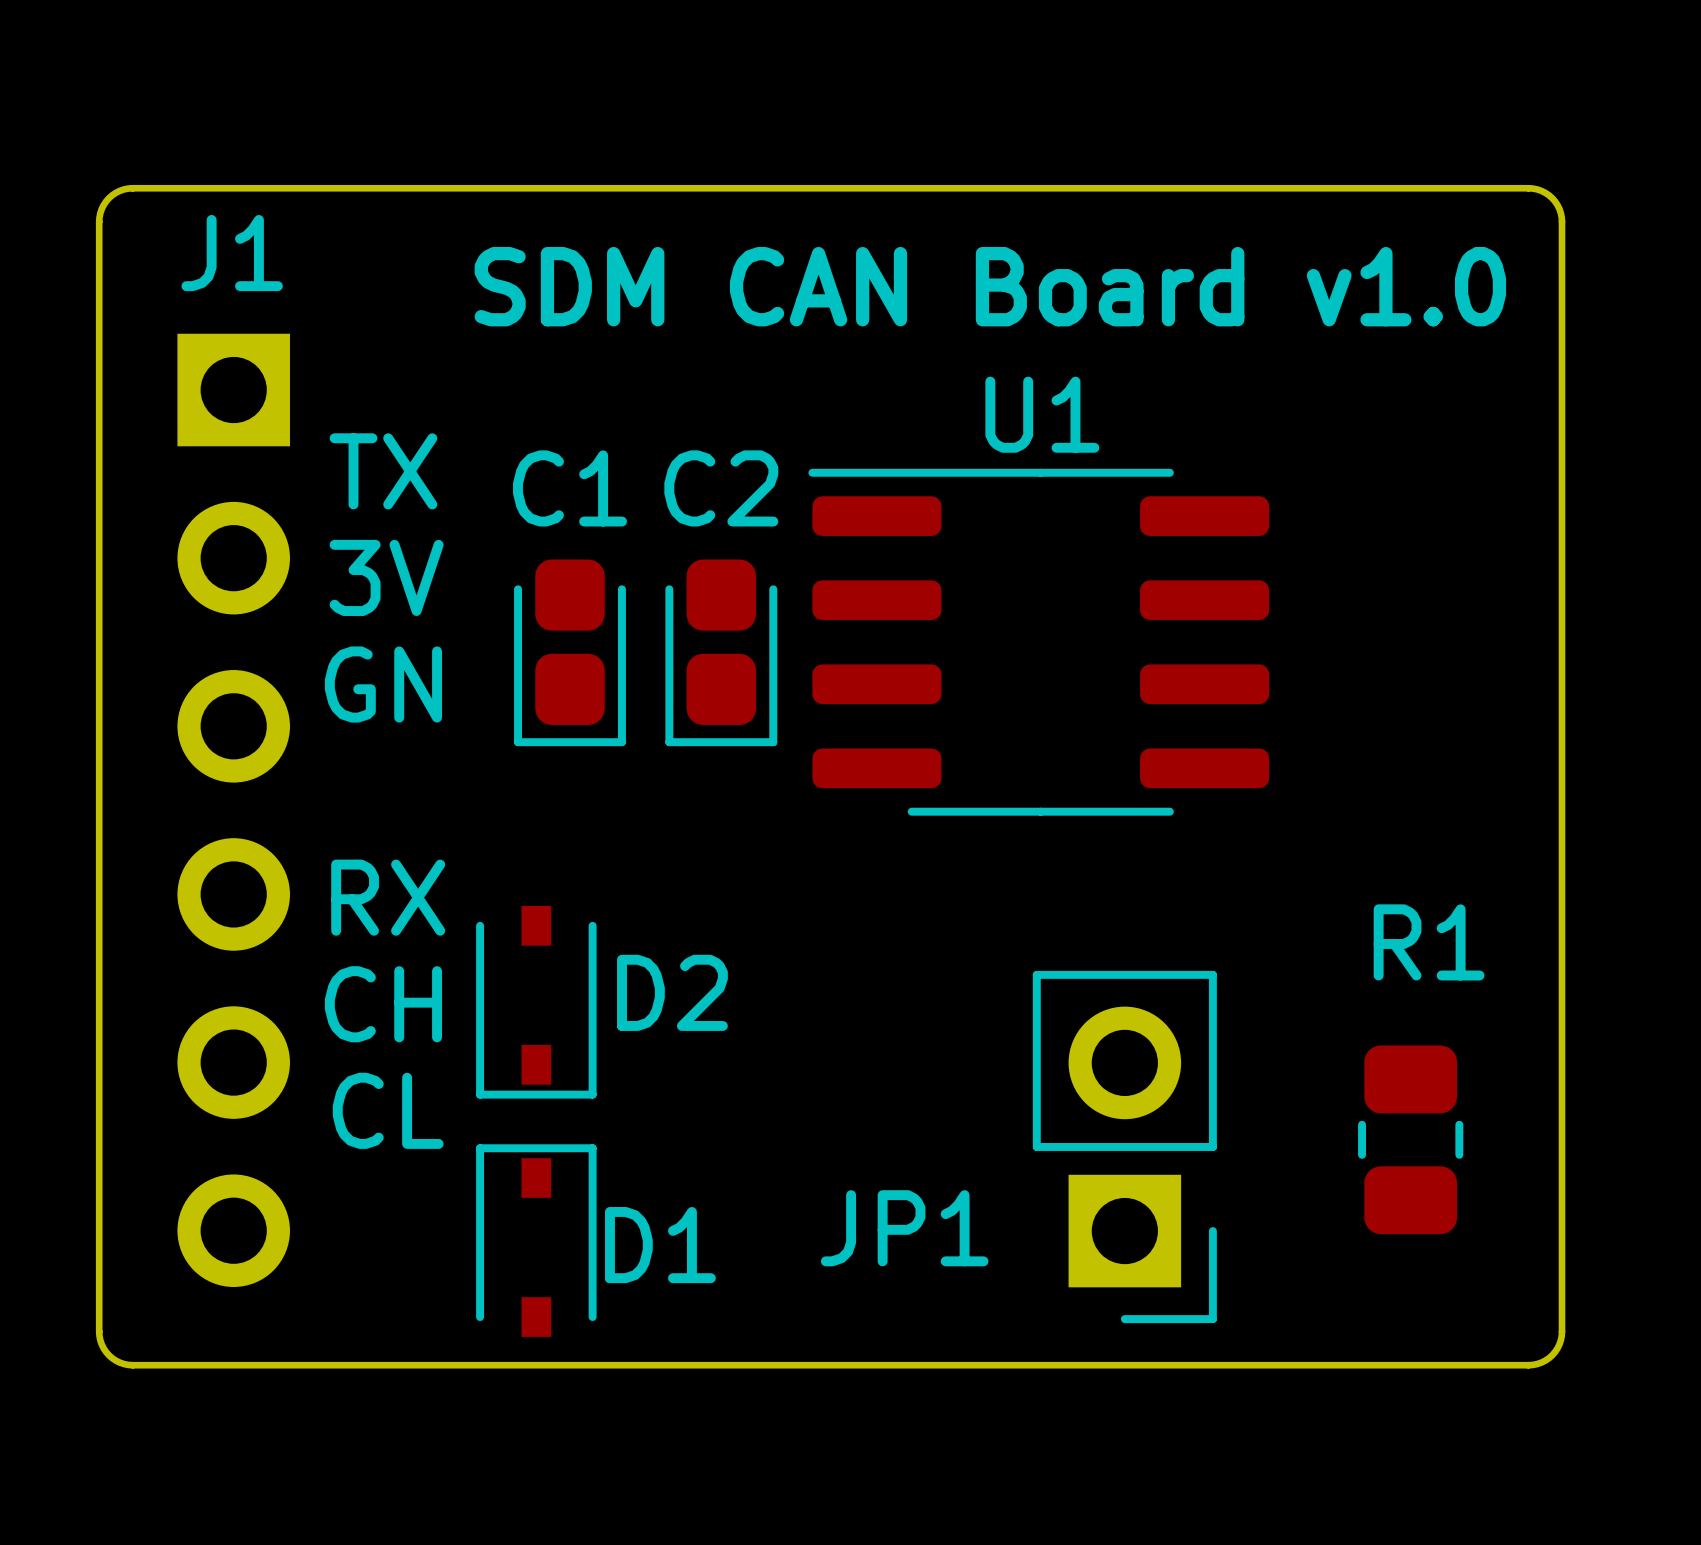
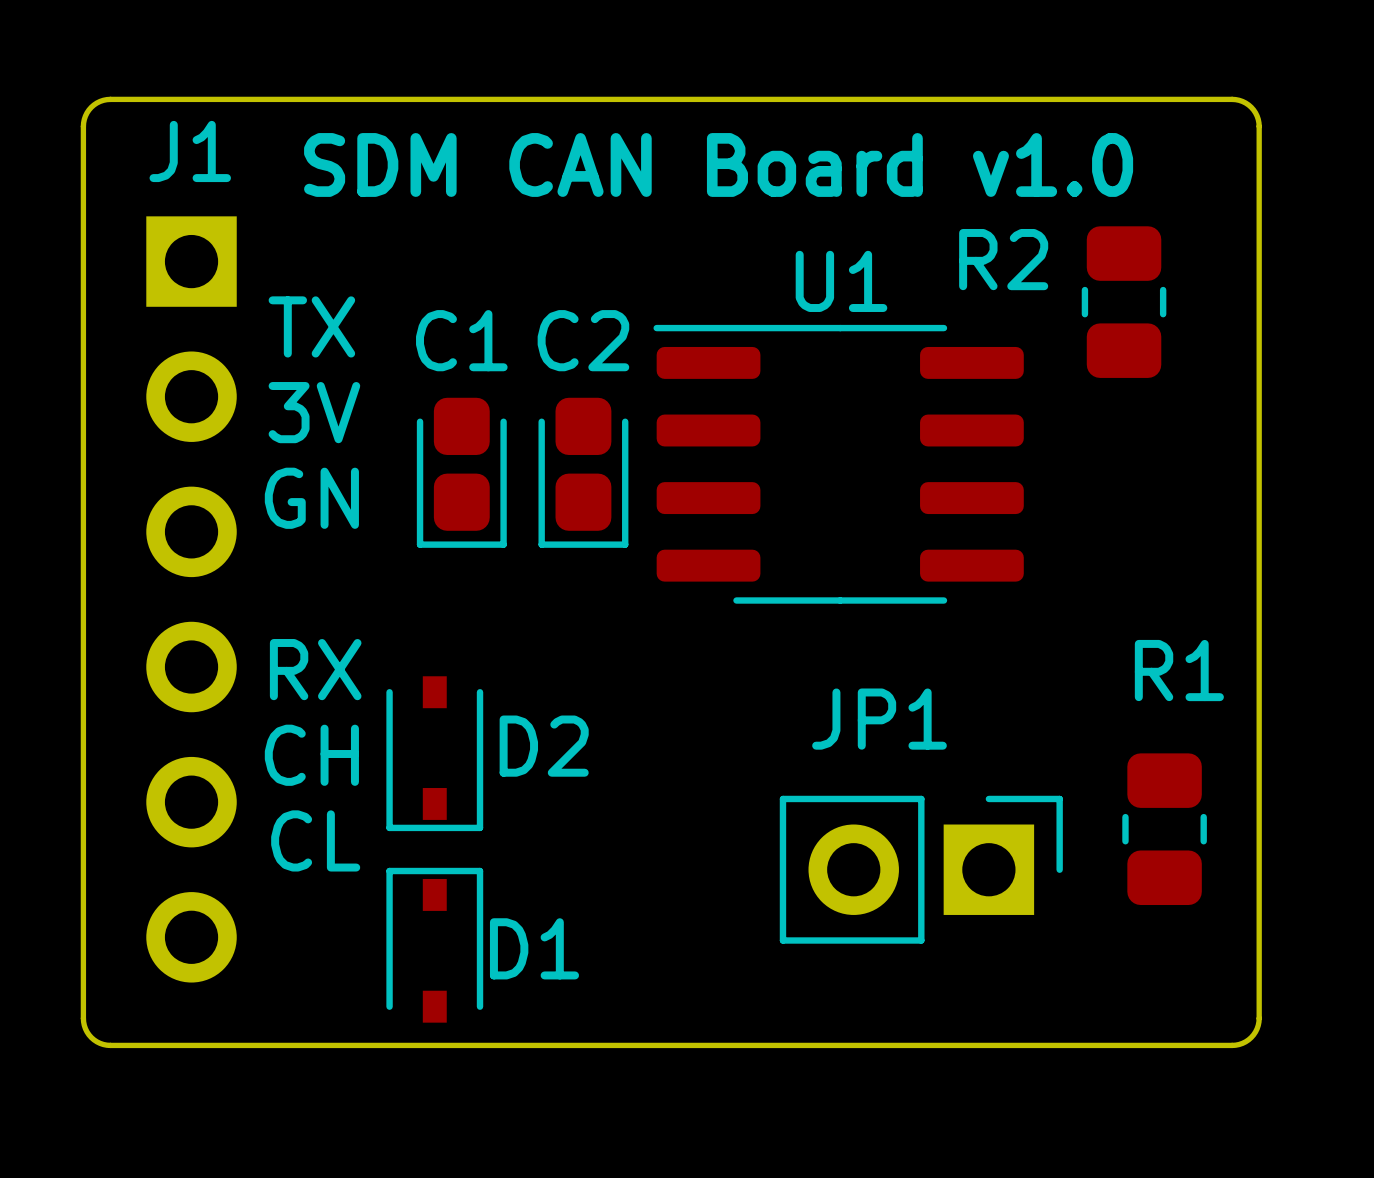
text position: SDM CAN Board v1.0 (990, 286) -> SDM CAN Board v1.0 (718, 164)
R2: none -> (1124, 302)
R1 position: (1410, 1139) -> (1164, 829)
JP1 rotation: 0° (1124, 1146) -> 90° counterclockwise (921, 869)
JP1 name position: JP1 (904, 1228) -> JP1 (879, 719)

